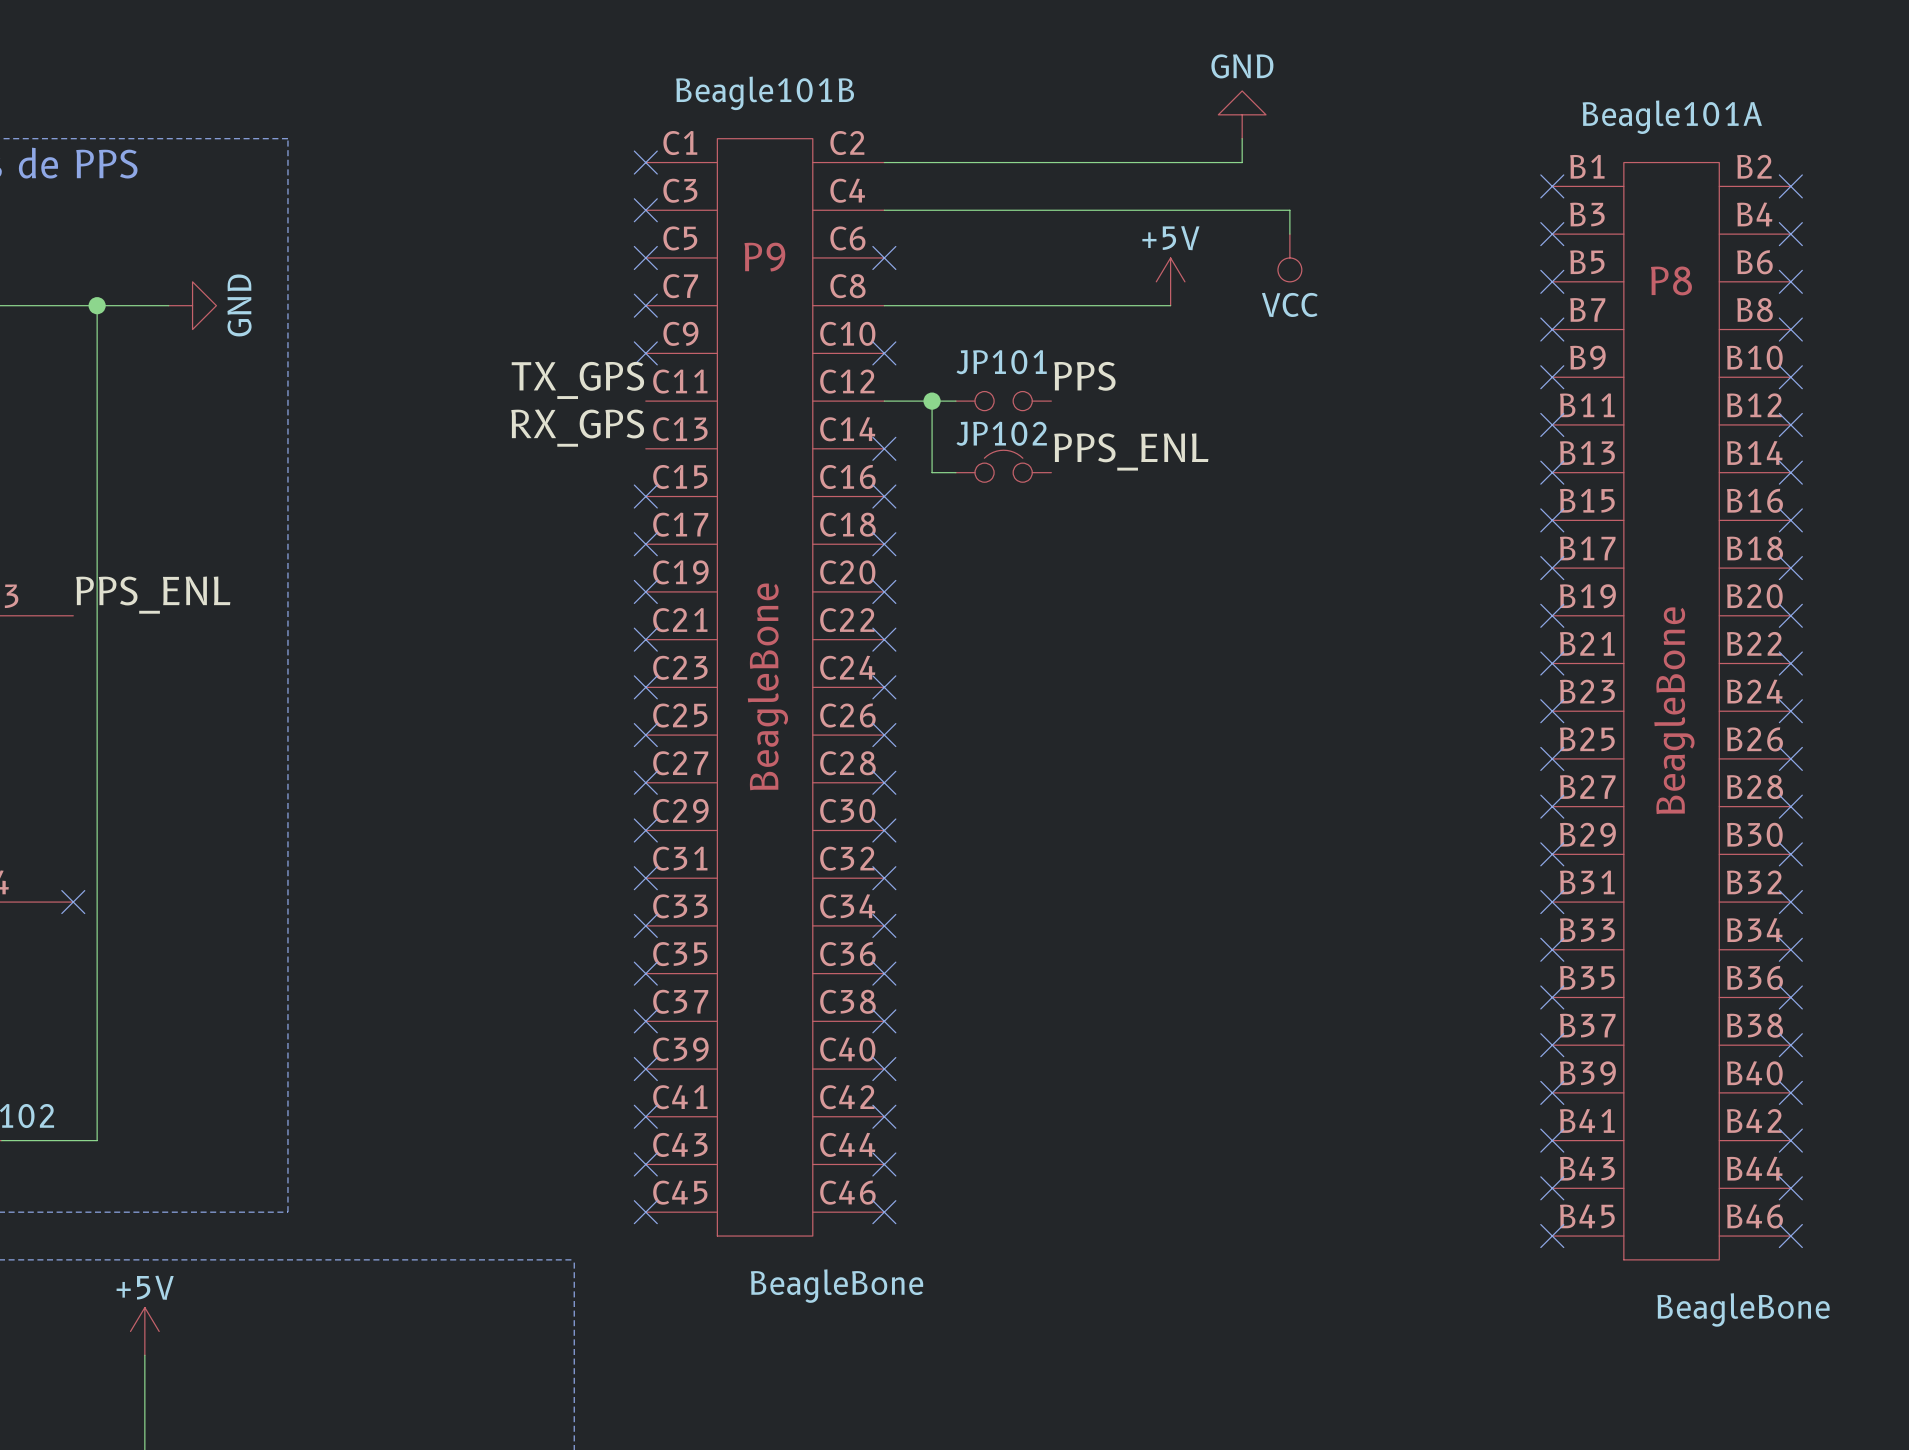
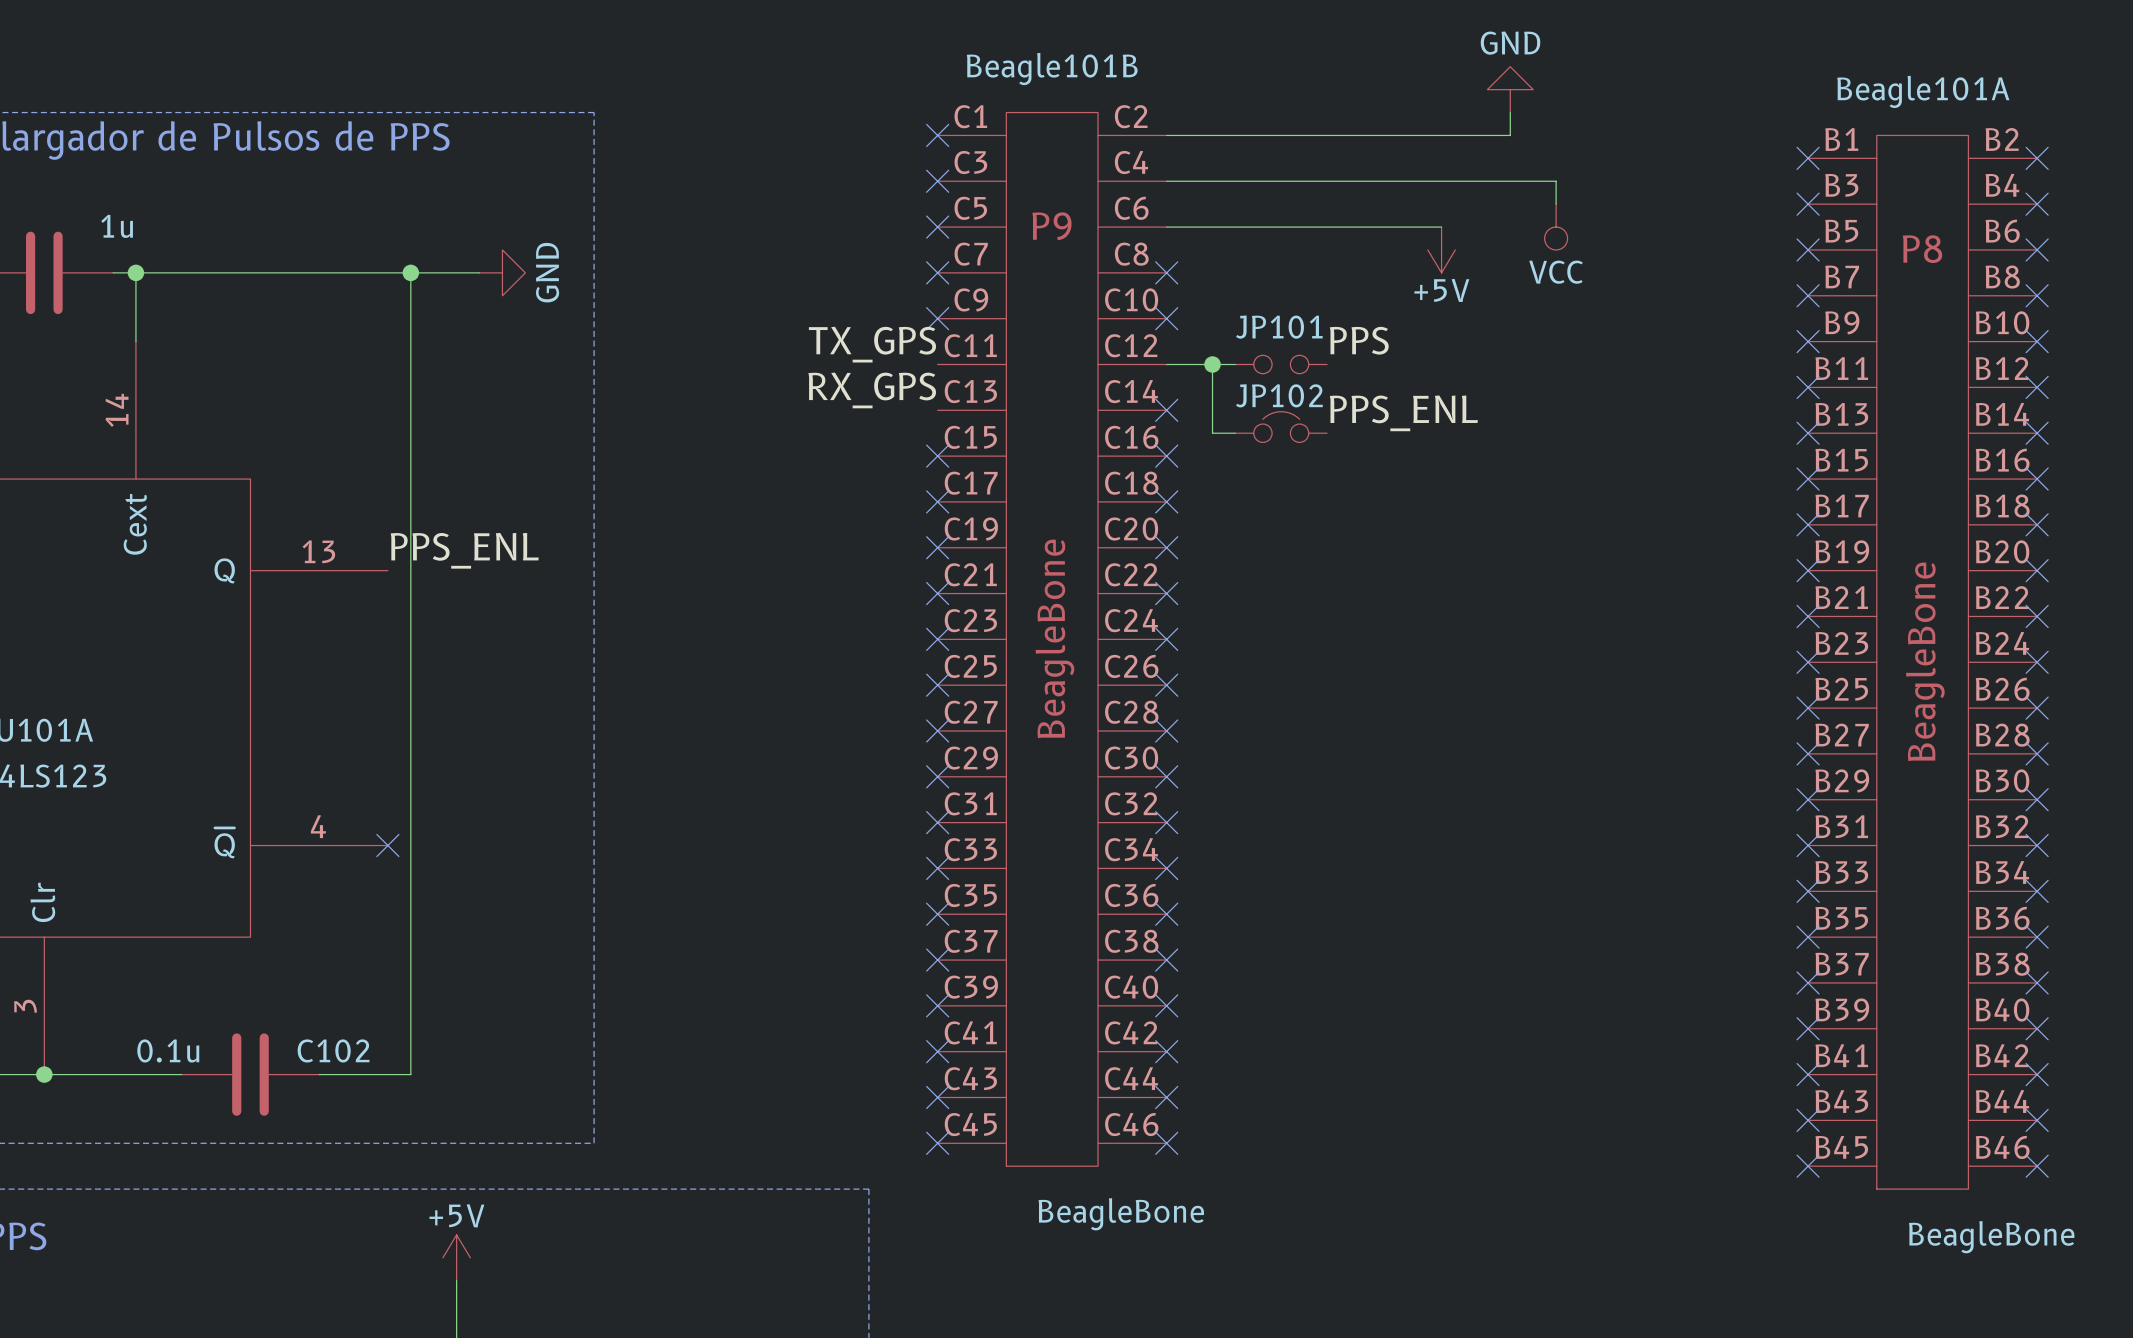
no-connect mark position: (884, 257) -> (1166, 272)
power symbol rotation: 0° (1170, 281) -> 180° (1441, 249)
wire: (884, 305) (1170, 305) -> (1166, 227) (1441, 227)

